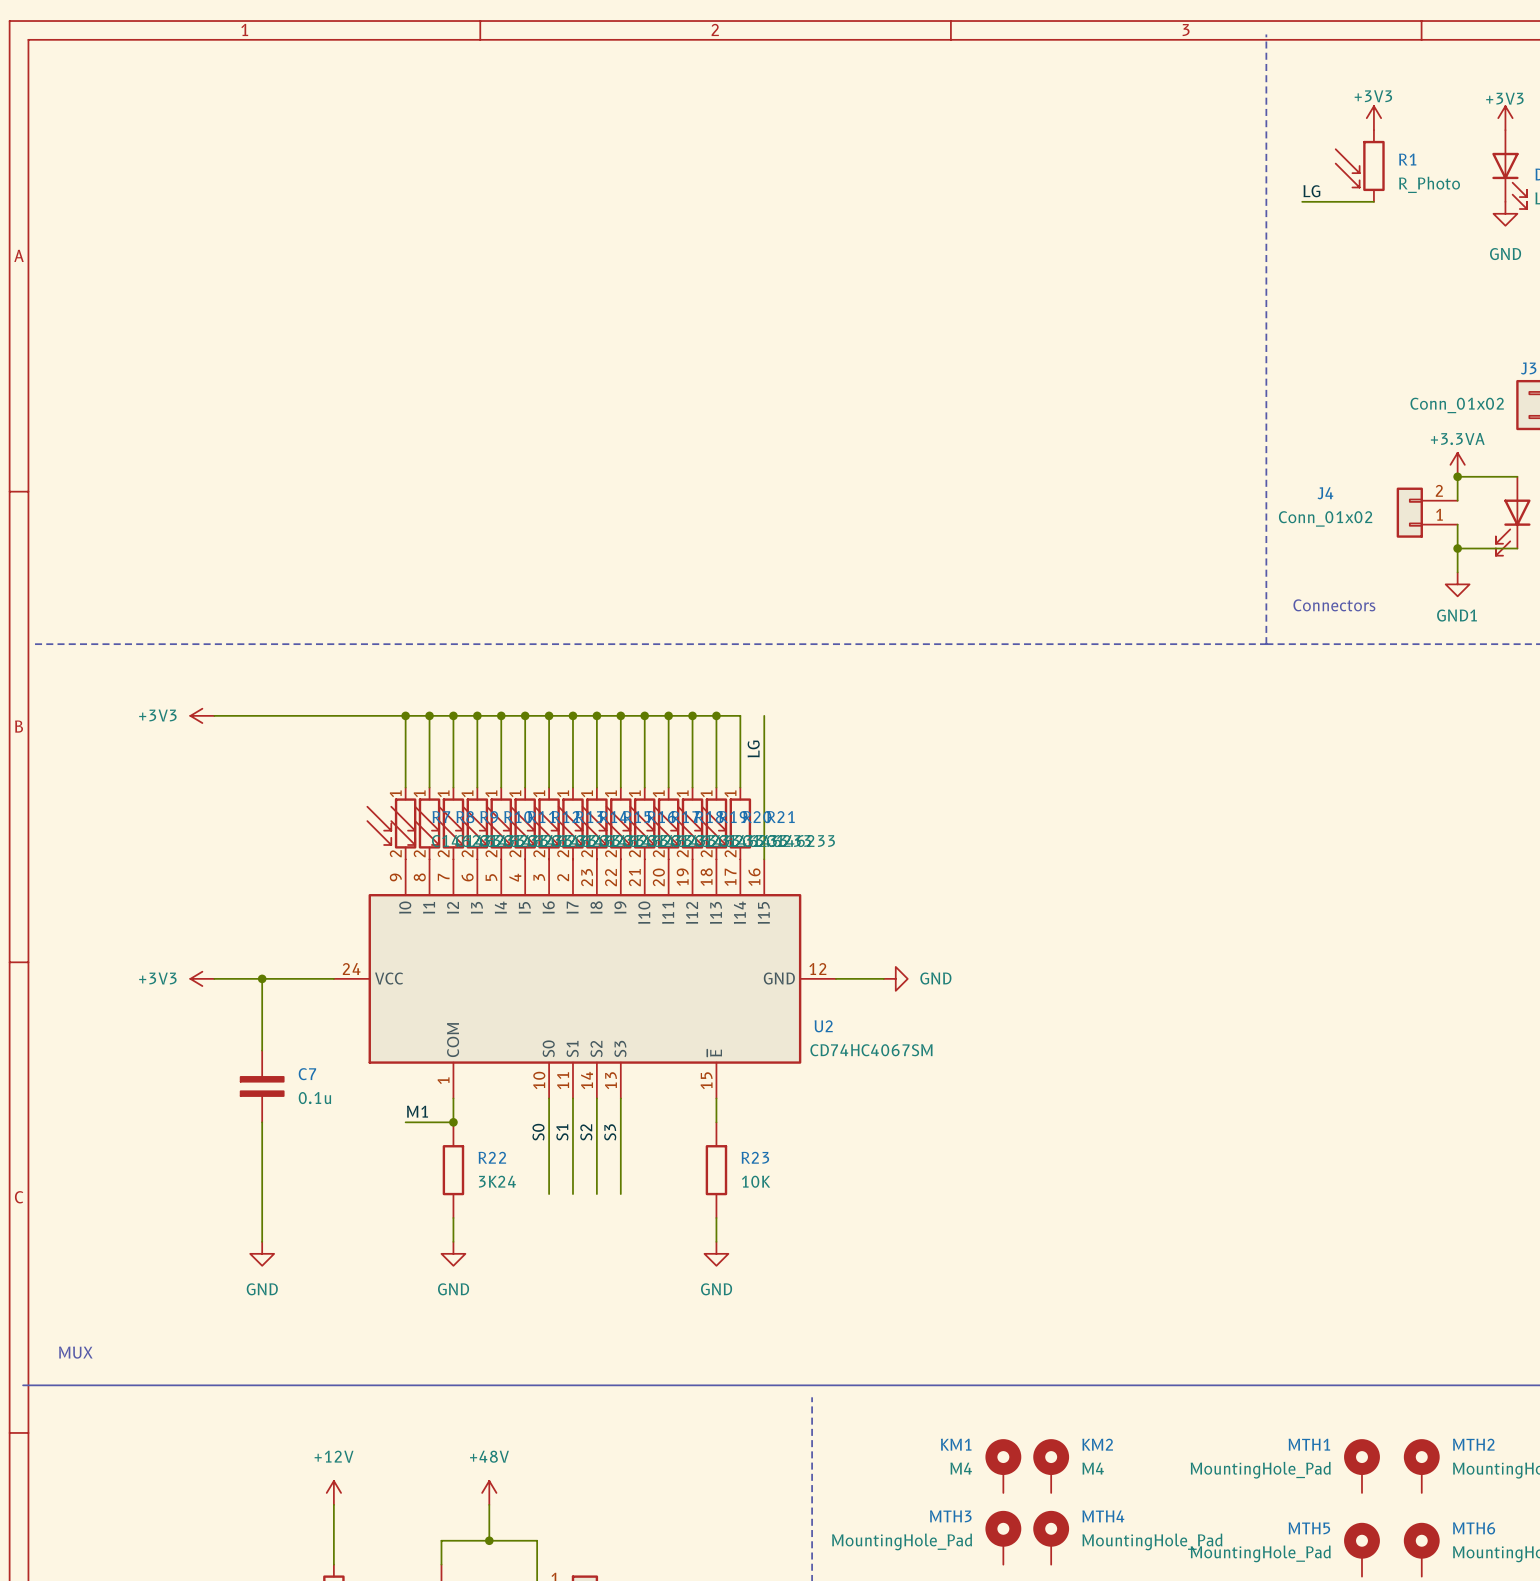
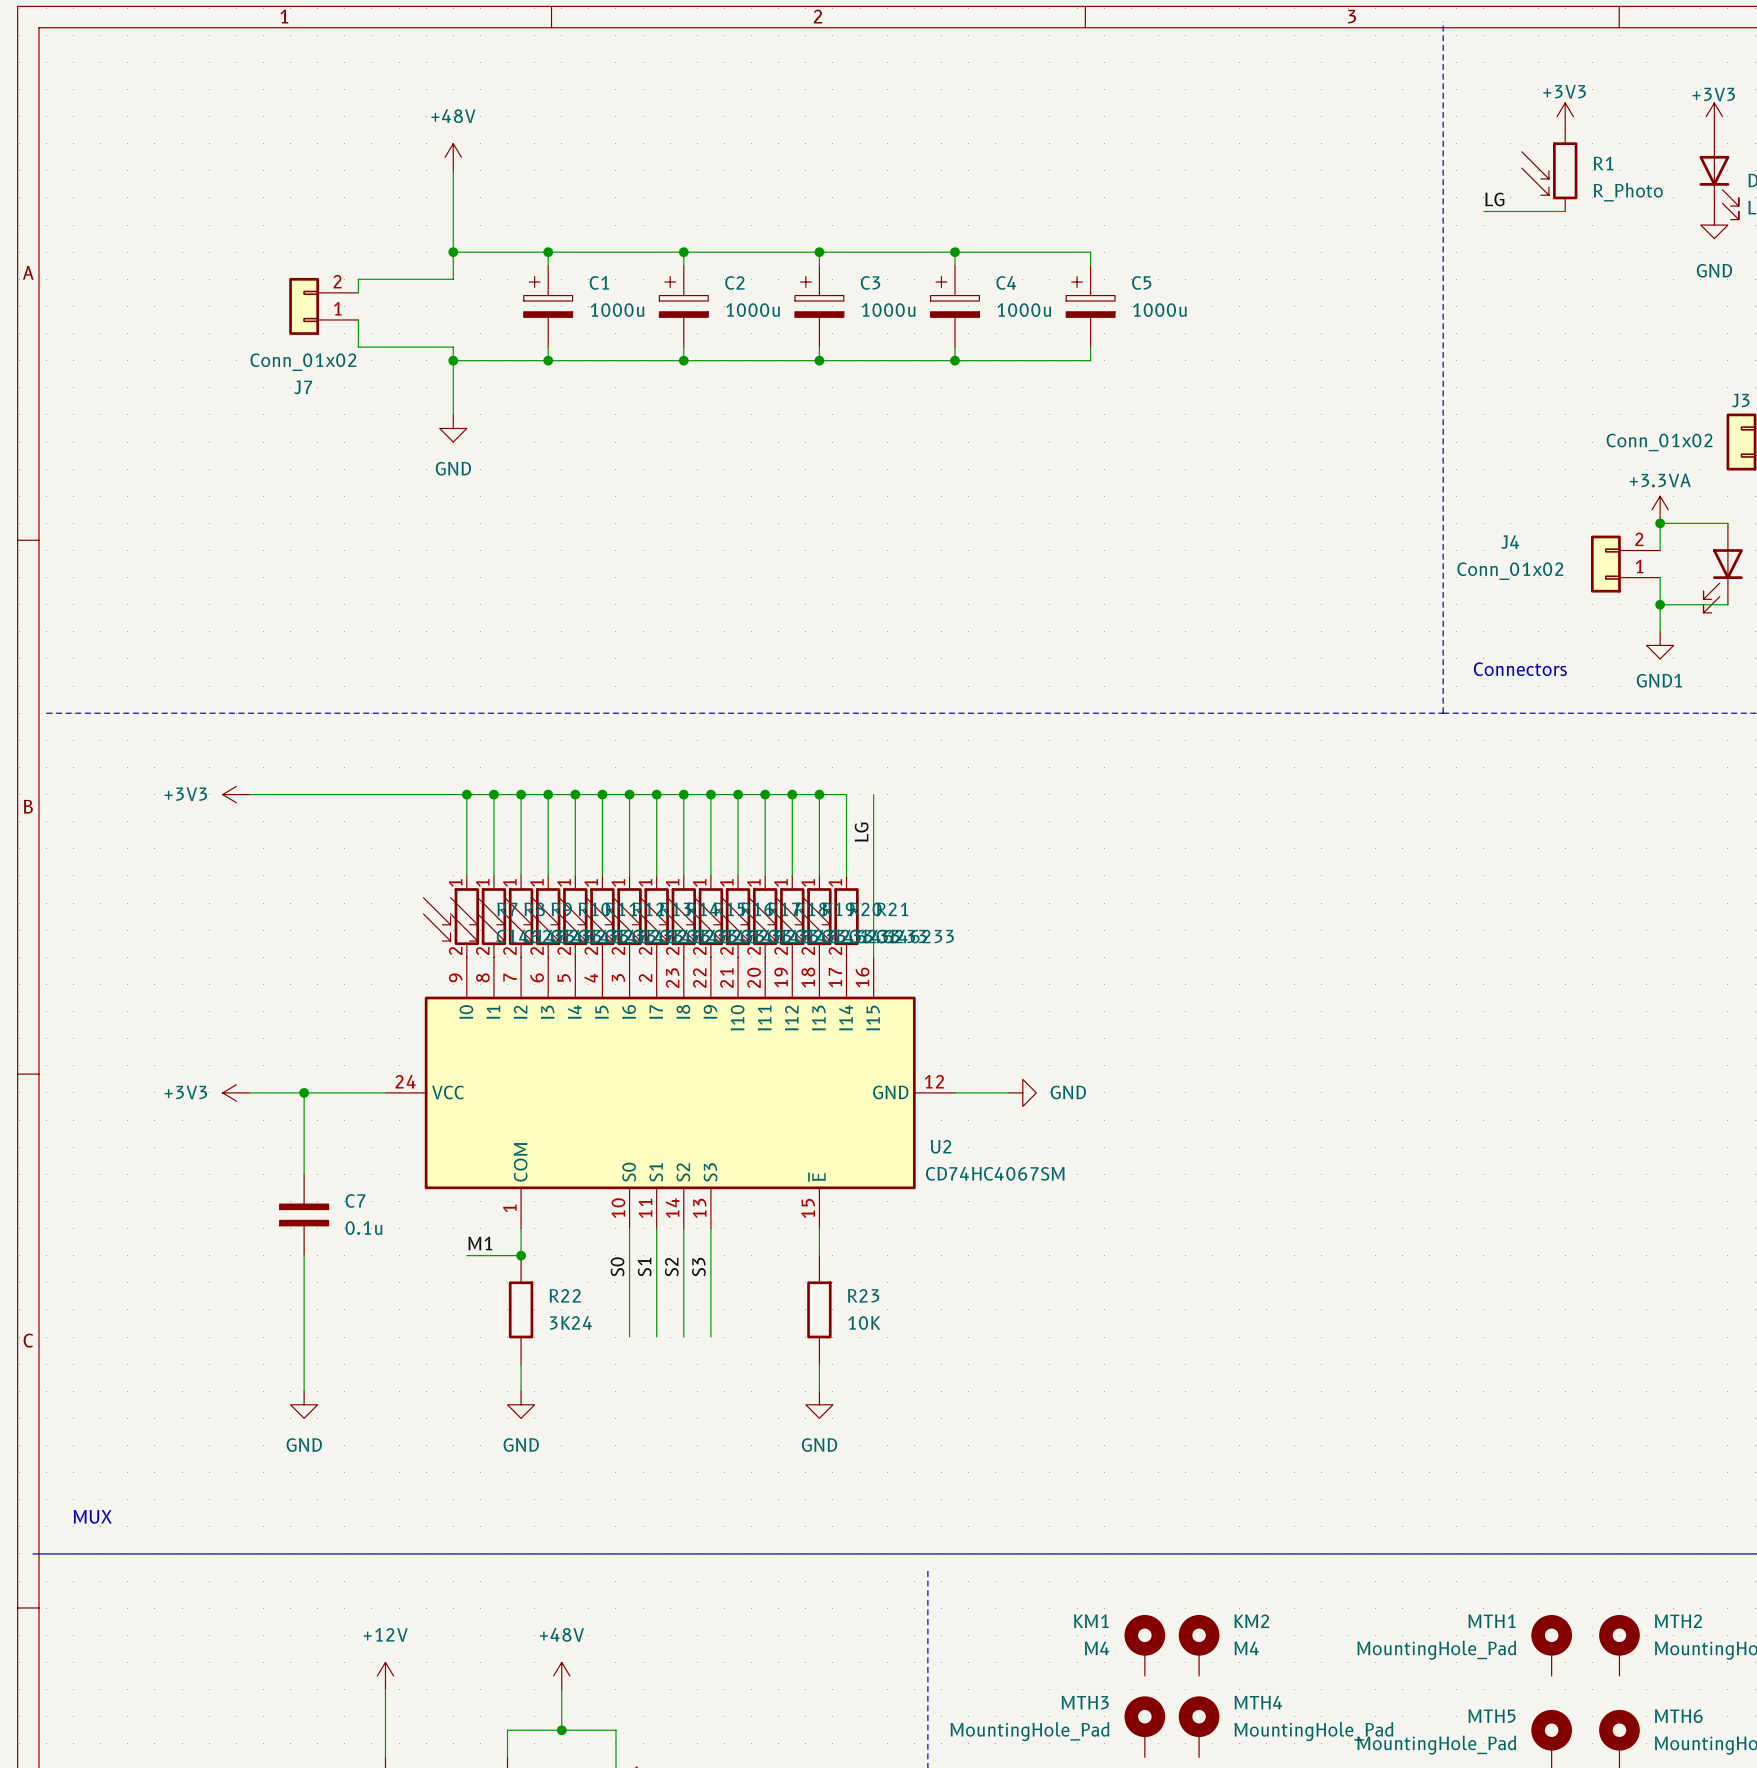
power symbol: none -> +48V (453, 157)
wire: none -> (453, 170) (453, 279) (358, 279) (358, 292)
wire: none -> (453, 252) (1090, 252) (1090, 265)
junction: none -> (453, 252)
wire: none -> (548, 252) (548, 265)
junction: none -> (548, 252)
wire: none -> (683, 252) (683, 265)
junction: none -> (683, 252)
wire: none -> (819, 252) (819, 265)
junction: none -> (819, 252)
wire: none -> (955, 252) (955, 265)
junction: none -> (955, 252)
J7: none -> Conn_01x02 (323, 306)
C1: none -> 1000u (548, 306)
C2: none -> 1000u (683, 306)
C3: none -> 1000u (819, 306)
C4: none -> 1000u (955, 306)
C5: none -> 1000u (1090, 306)
wire: none -> (358, 319) (358, 347) (453, 347) (453, 414)
wire: none -> (548, 347) (548, 360)
wire: none -> (683, 347) (683, 360)
wire: none -> (819, 347) (819, 360)
wire: none -> (955, 347) (955, 360)
wire: none -> (1090, 347) (1090, 360) (453, 360)
junction: none -> (453, 360)
junction: none -> (548, 360)
junction: none -> (683, 360)
junction: none -> (819, 360)
junction: none -> (955, 360)
power symbol: none -> GND (453, 428)

